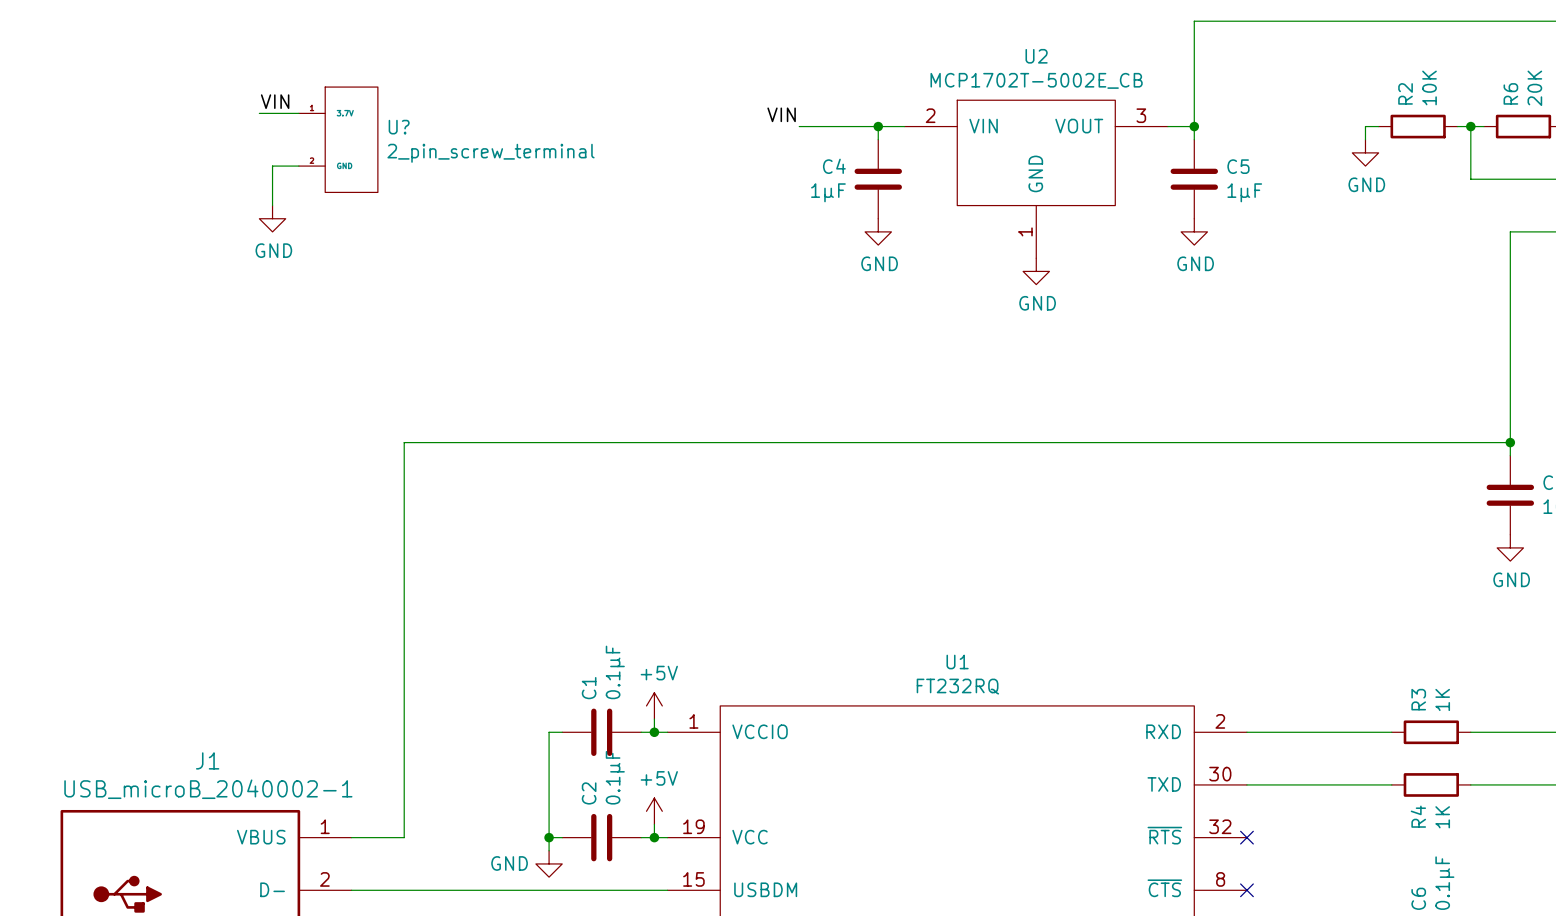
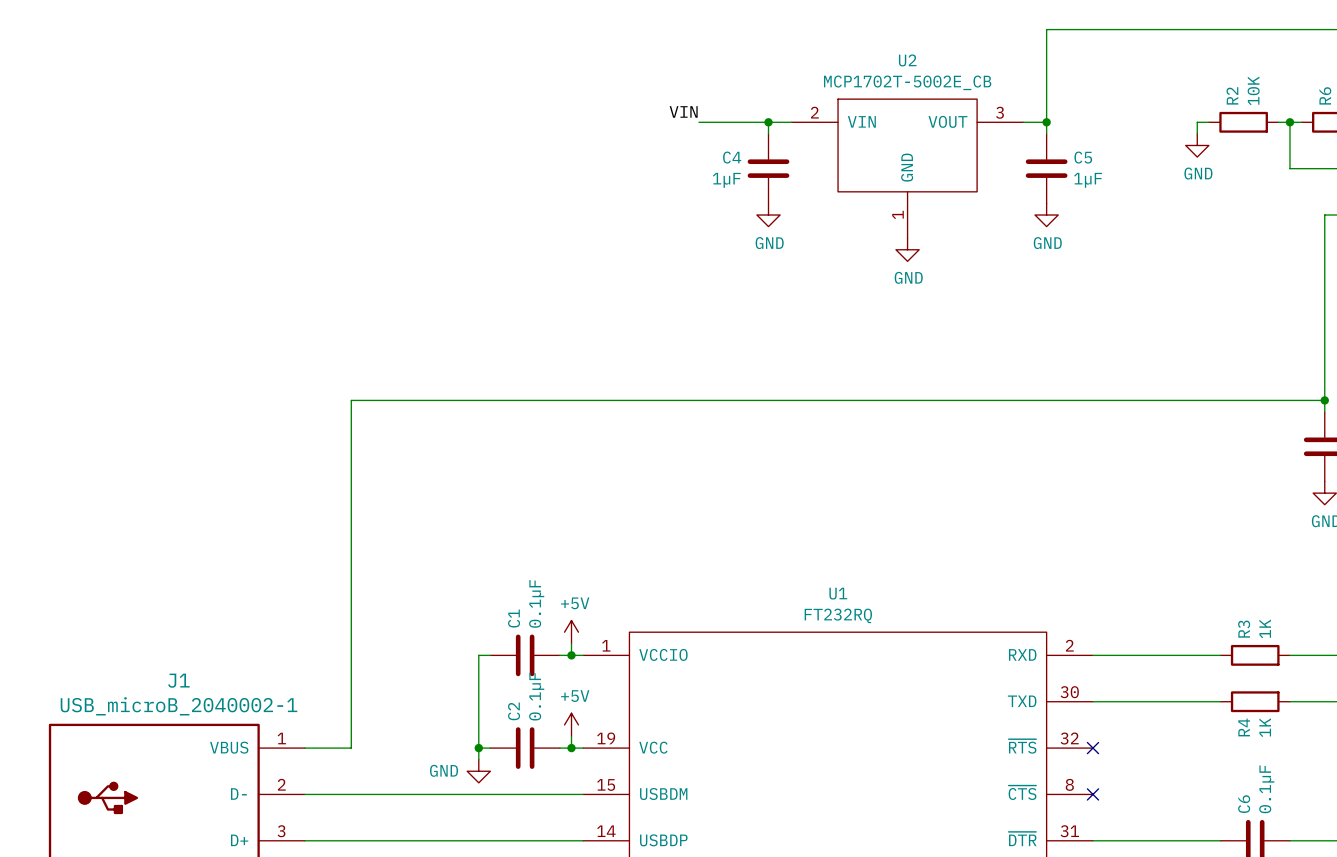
label: VIN (275, 101) -> none
wire: (259, 113) (298, 113) -> none
U?: 2_pin_screw_terminal (338, 139) -> none
wire: (298, 166) (272, 166) (272, 205) -> none
power symbol: GND (272, 218) -> none

